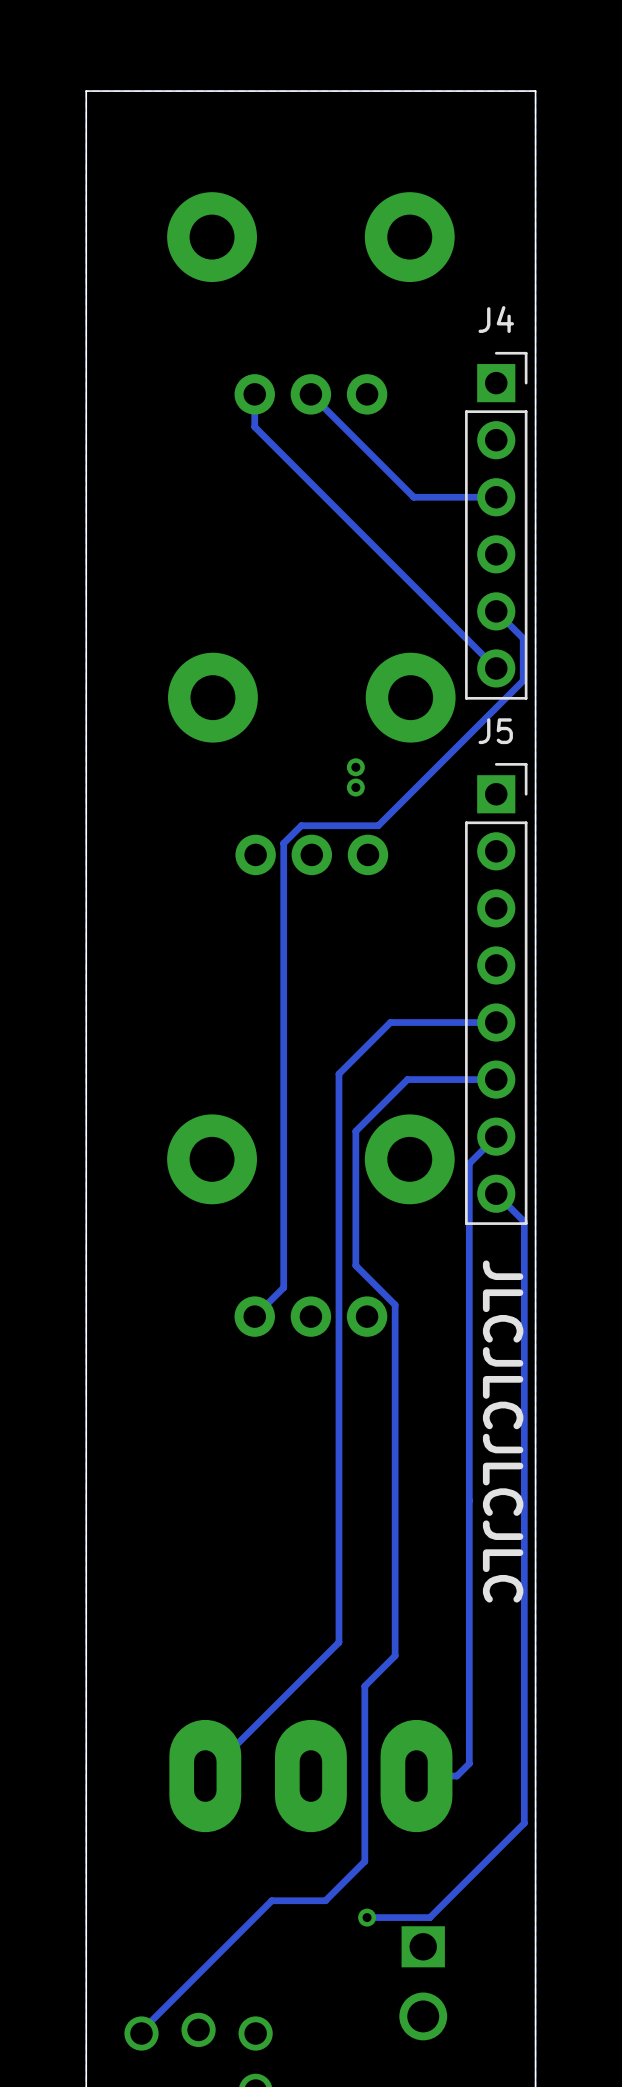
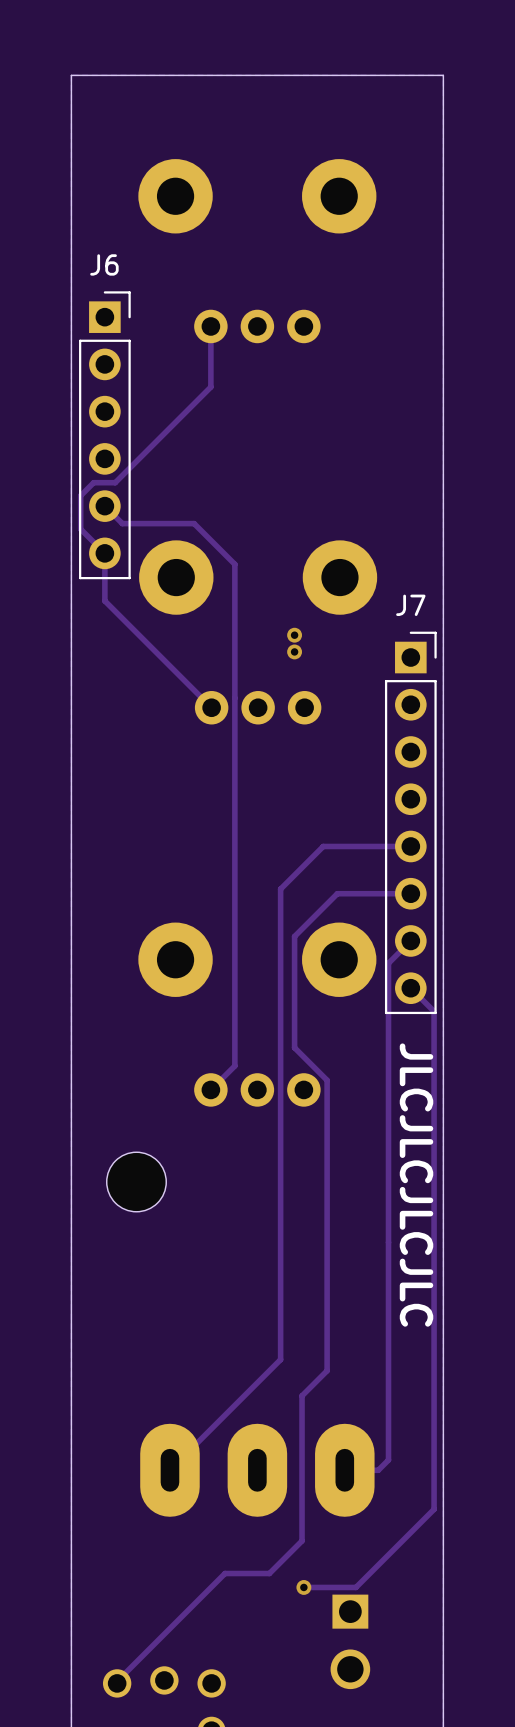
track: (310, 394) (413, 497) (496, 497) -> none
track: (254, 426) (496, 668) -> (210, 353) (210, 387) (115, 482) (93, 482) (80, 495) (80, 529) (104, 553) (104, 600) (211, 707)
J6: none -> (104, 435)
J4: (496, 525) -> none
track: (496, 611) (523, 638) (523, 680) (378, 825) (301, 825) (283, 843) -> (104, 506) (122, 523) (194, 523) (234, 564) (234, 698)
J5 name: J5 (495, 731) -> J7 (410, 605)
part: none -> (136, 1182)

